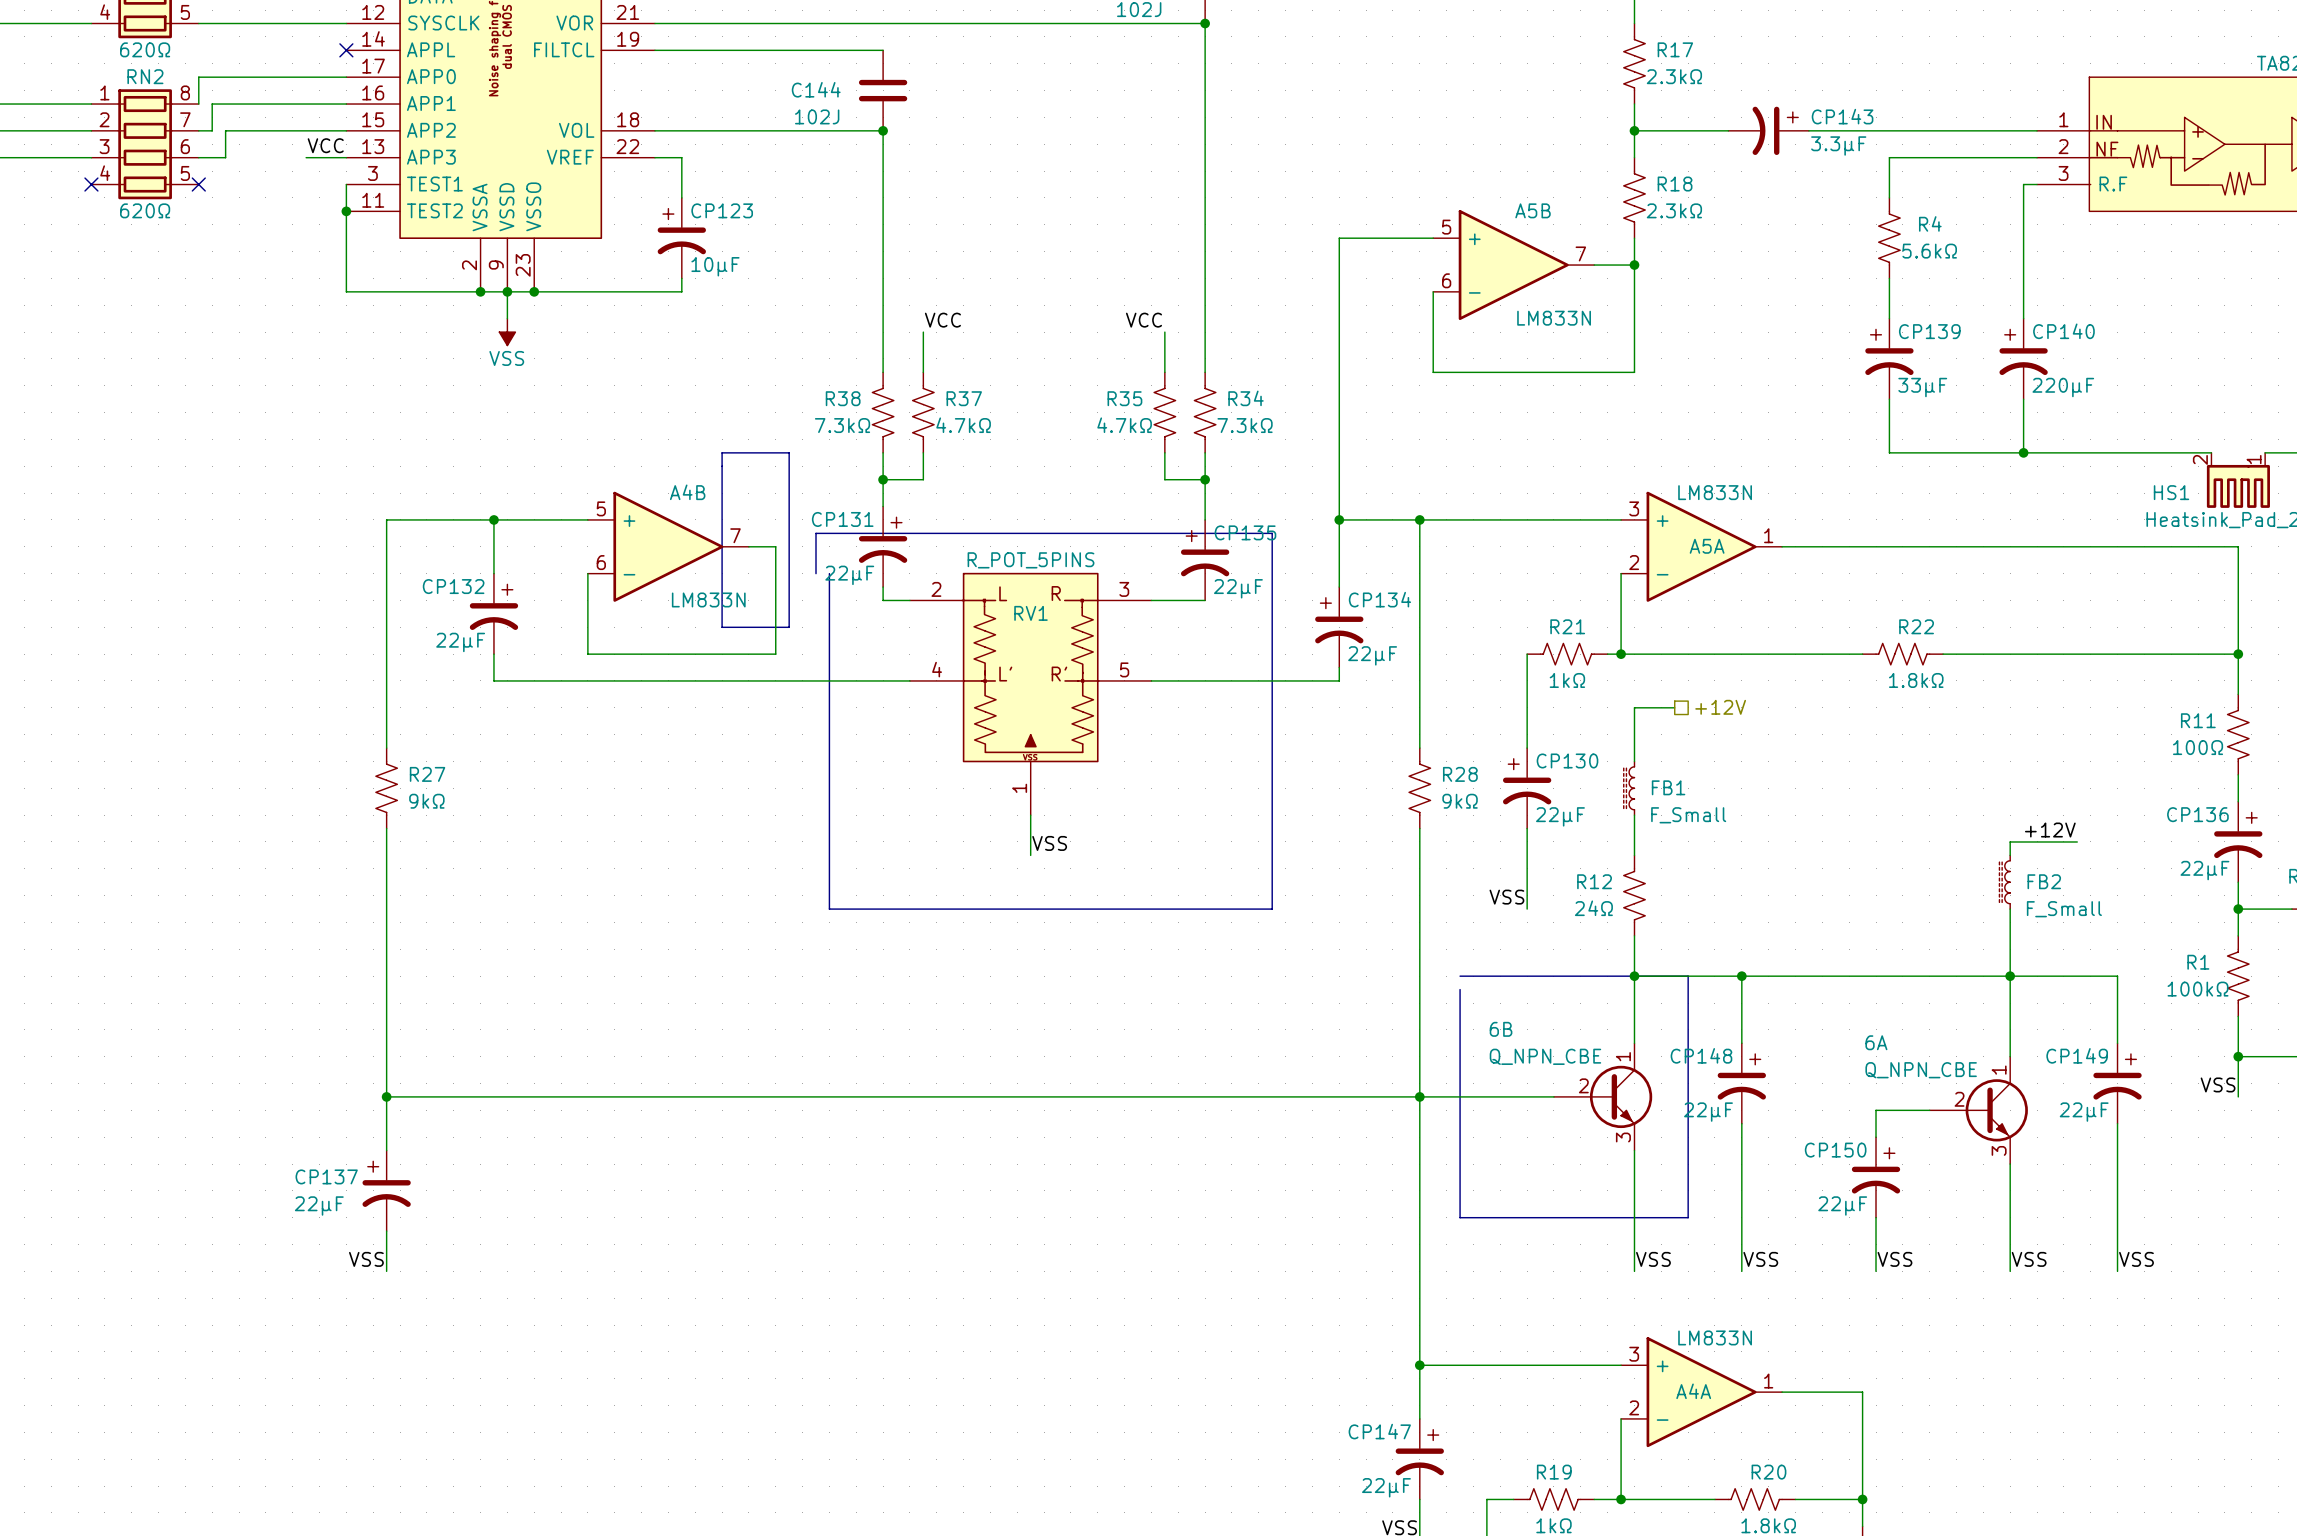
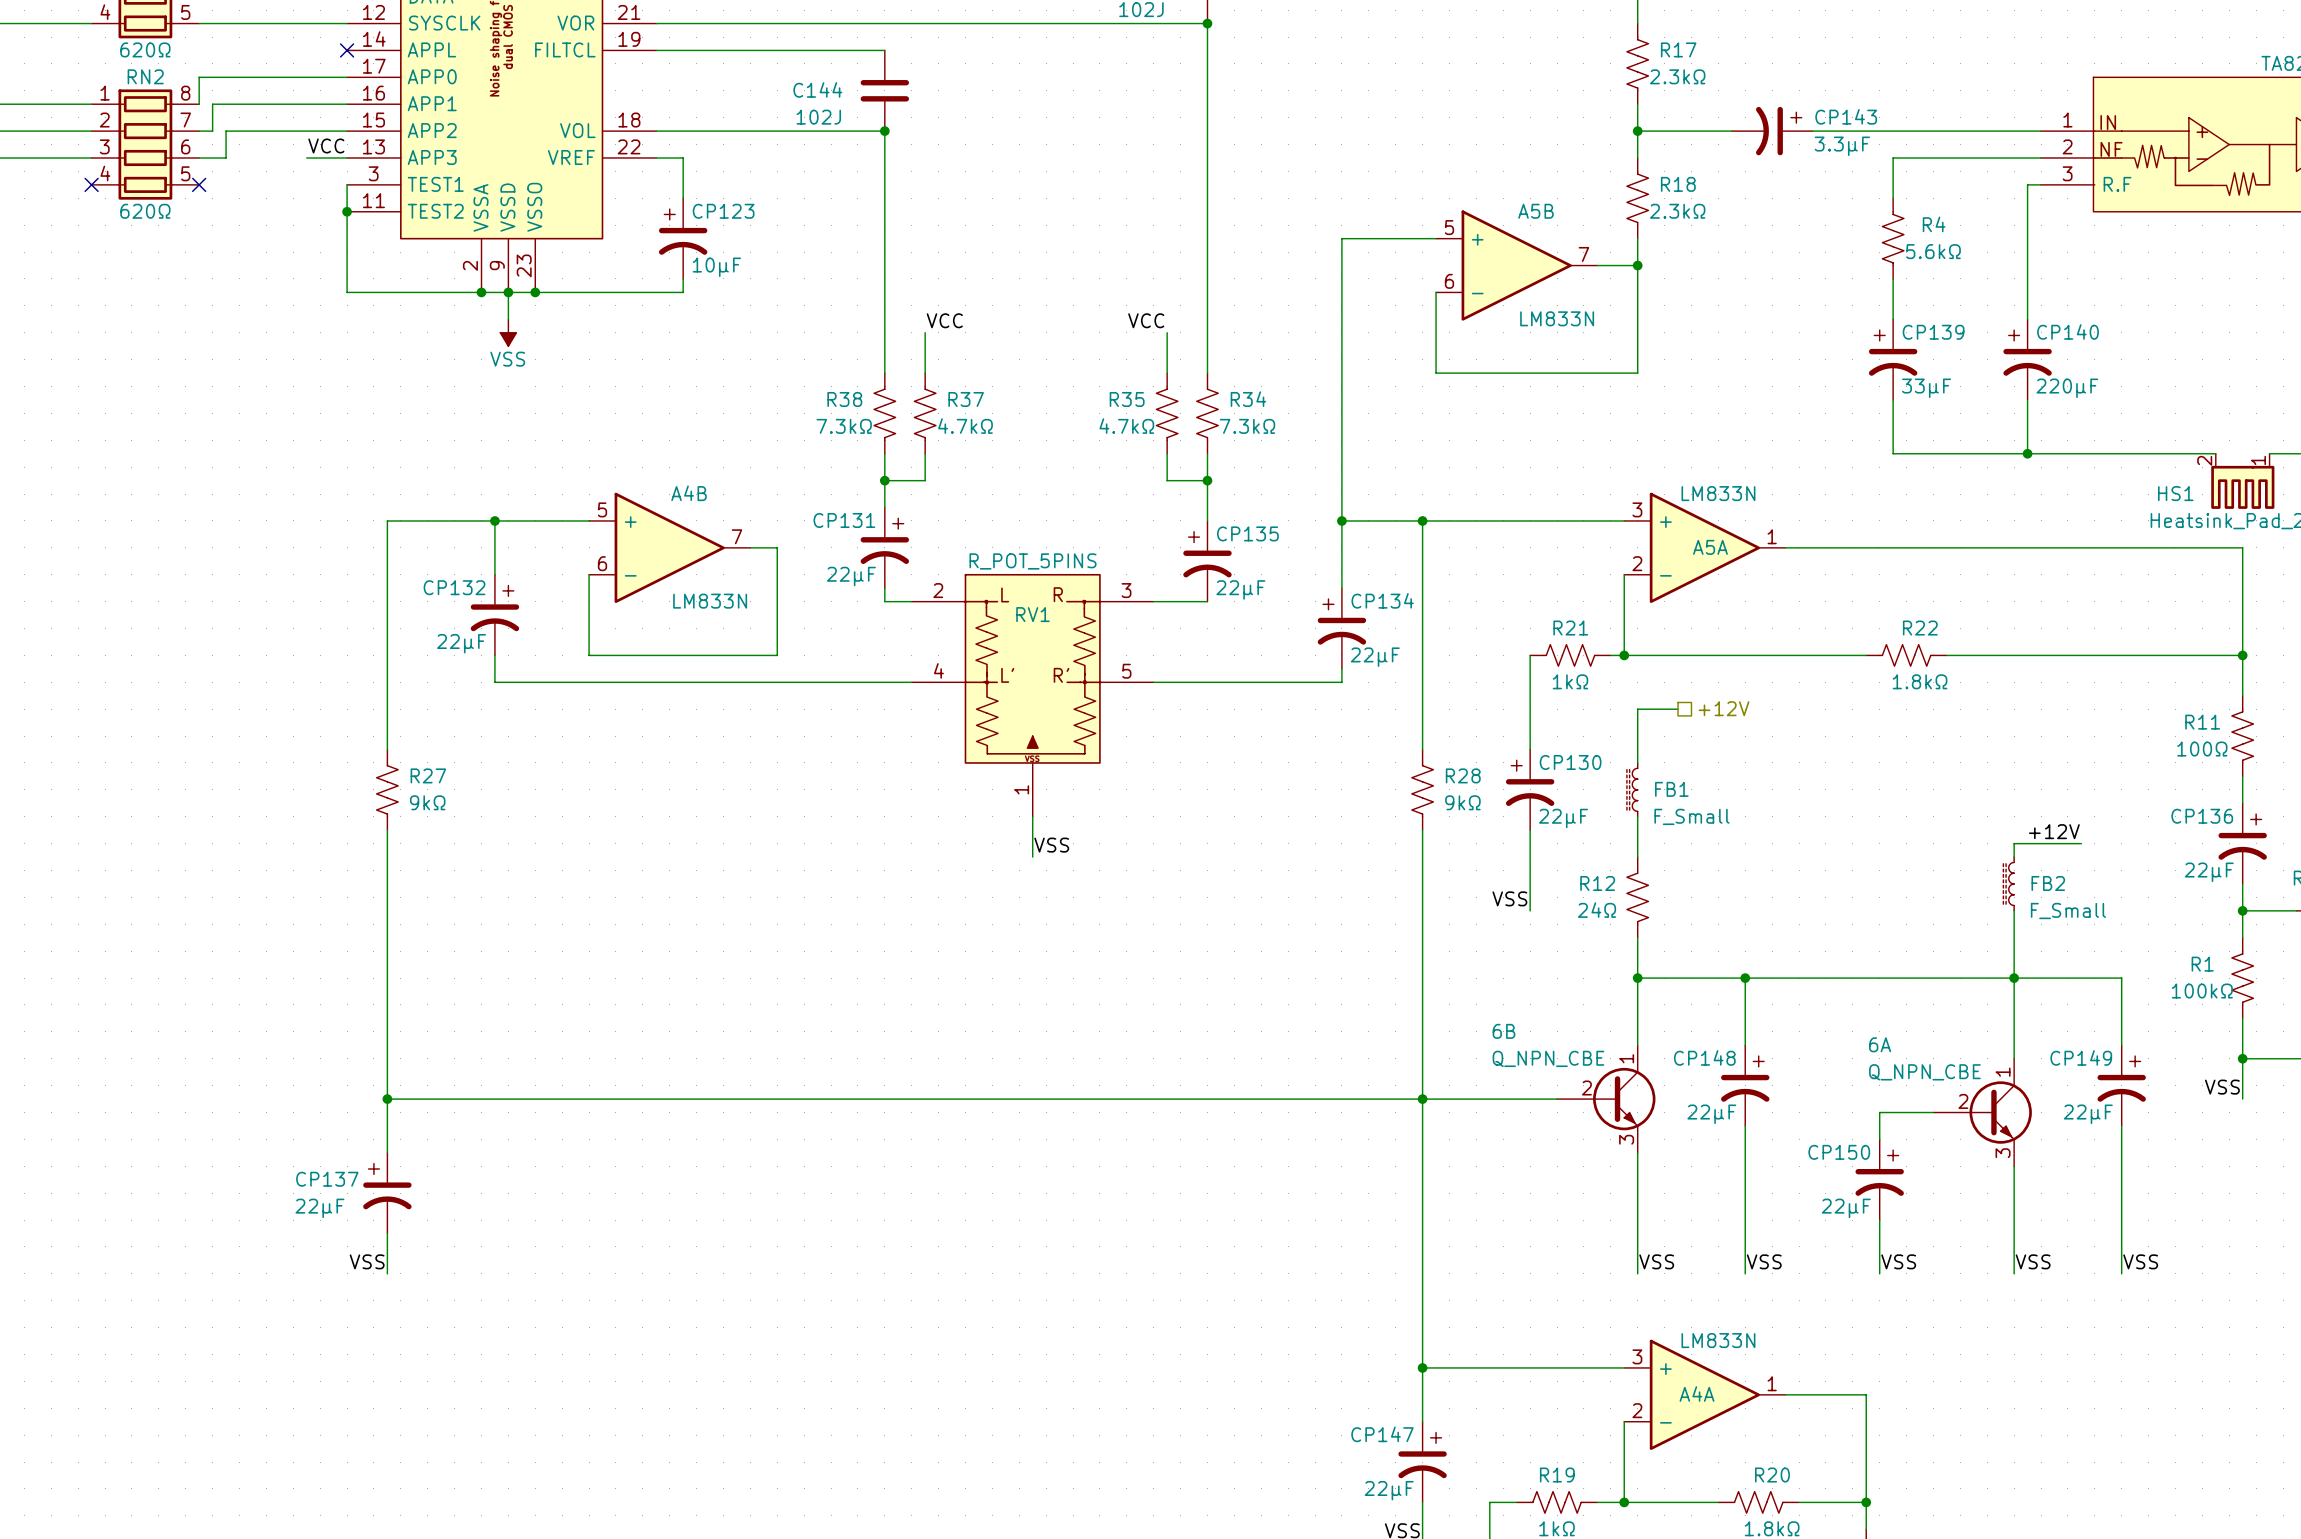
line: (722, 452) (722, 627) (789, 627) (789, 452) (722, 452) -> none
line: (816, 573) (816, 533) (1272, 533) (1272, 909) (829, 909) (829, 573) -> none
line: (1460, 976) (1688, 976) (1688, 1217) (1460, 1217) (1460, 989) -> none

